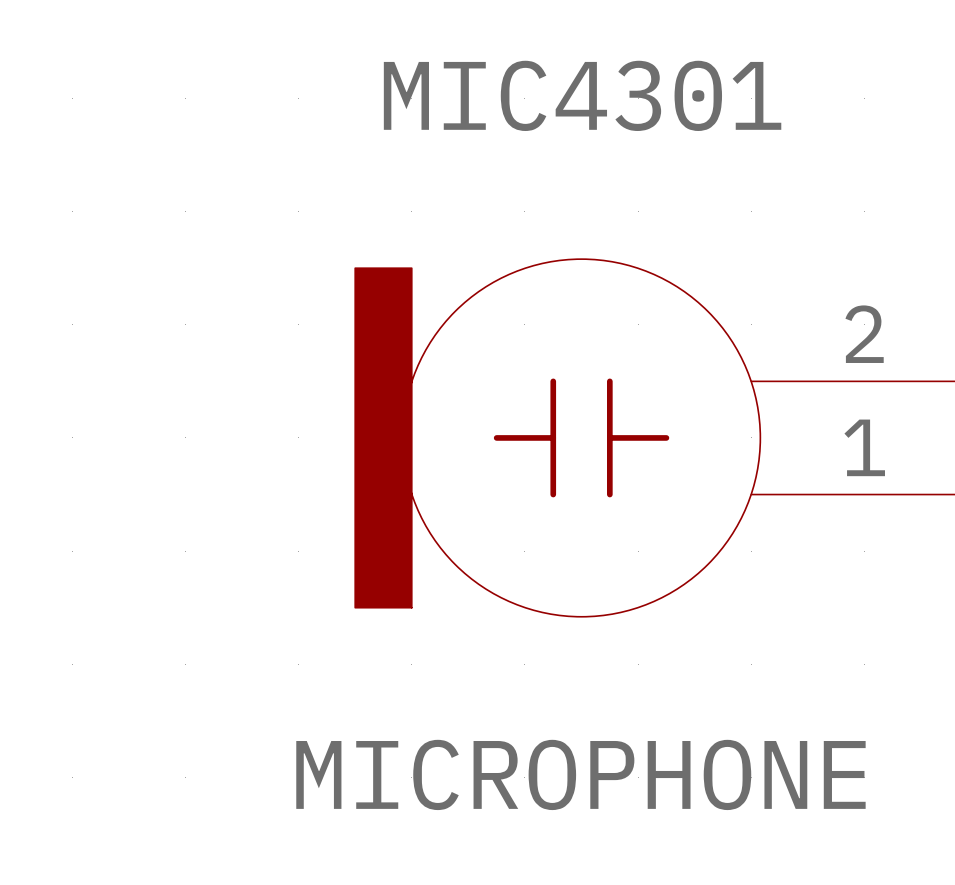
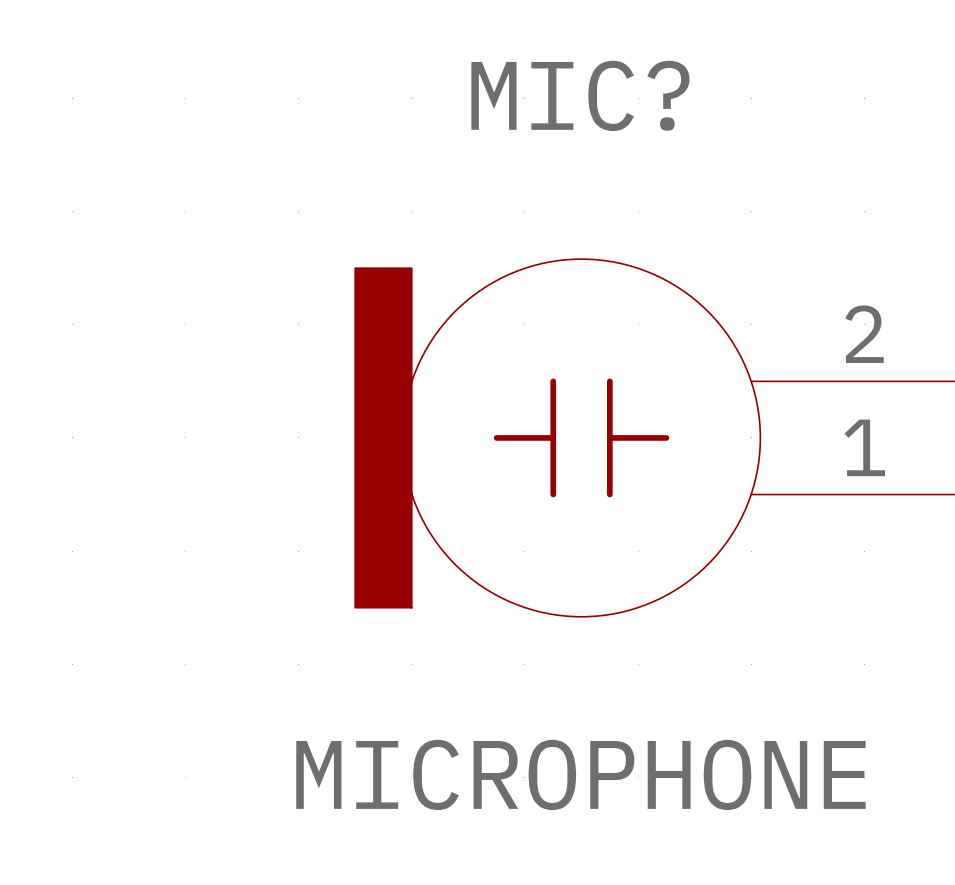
MIC4301 name: MIC4301 (582, 95) -> MIC? (580, 95)

